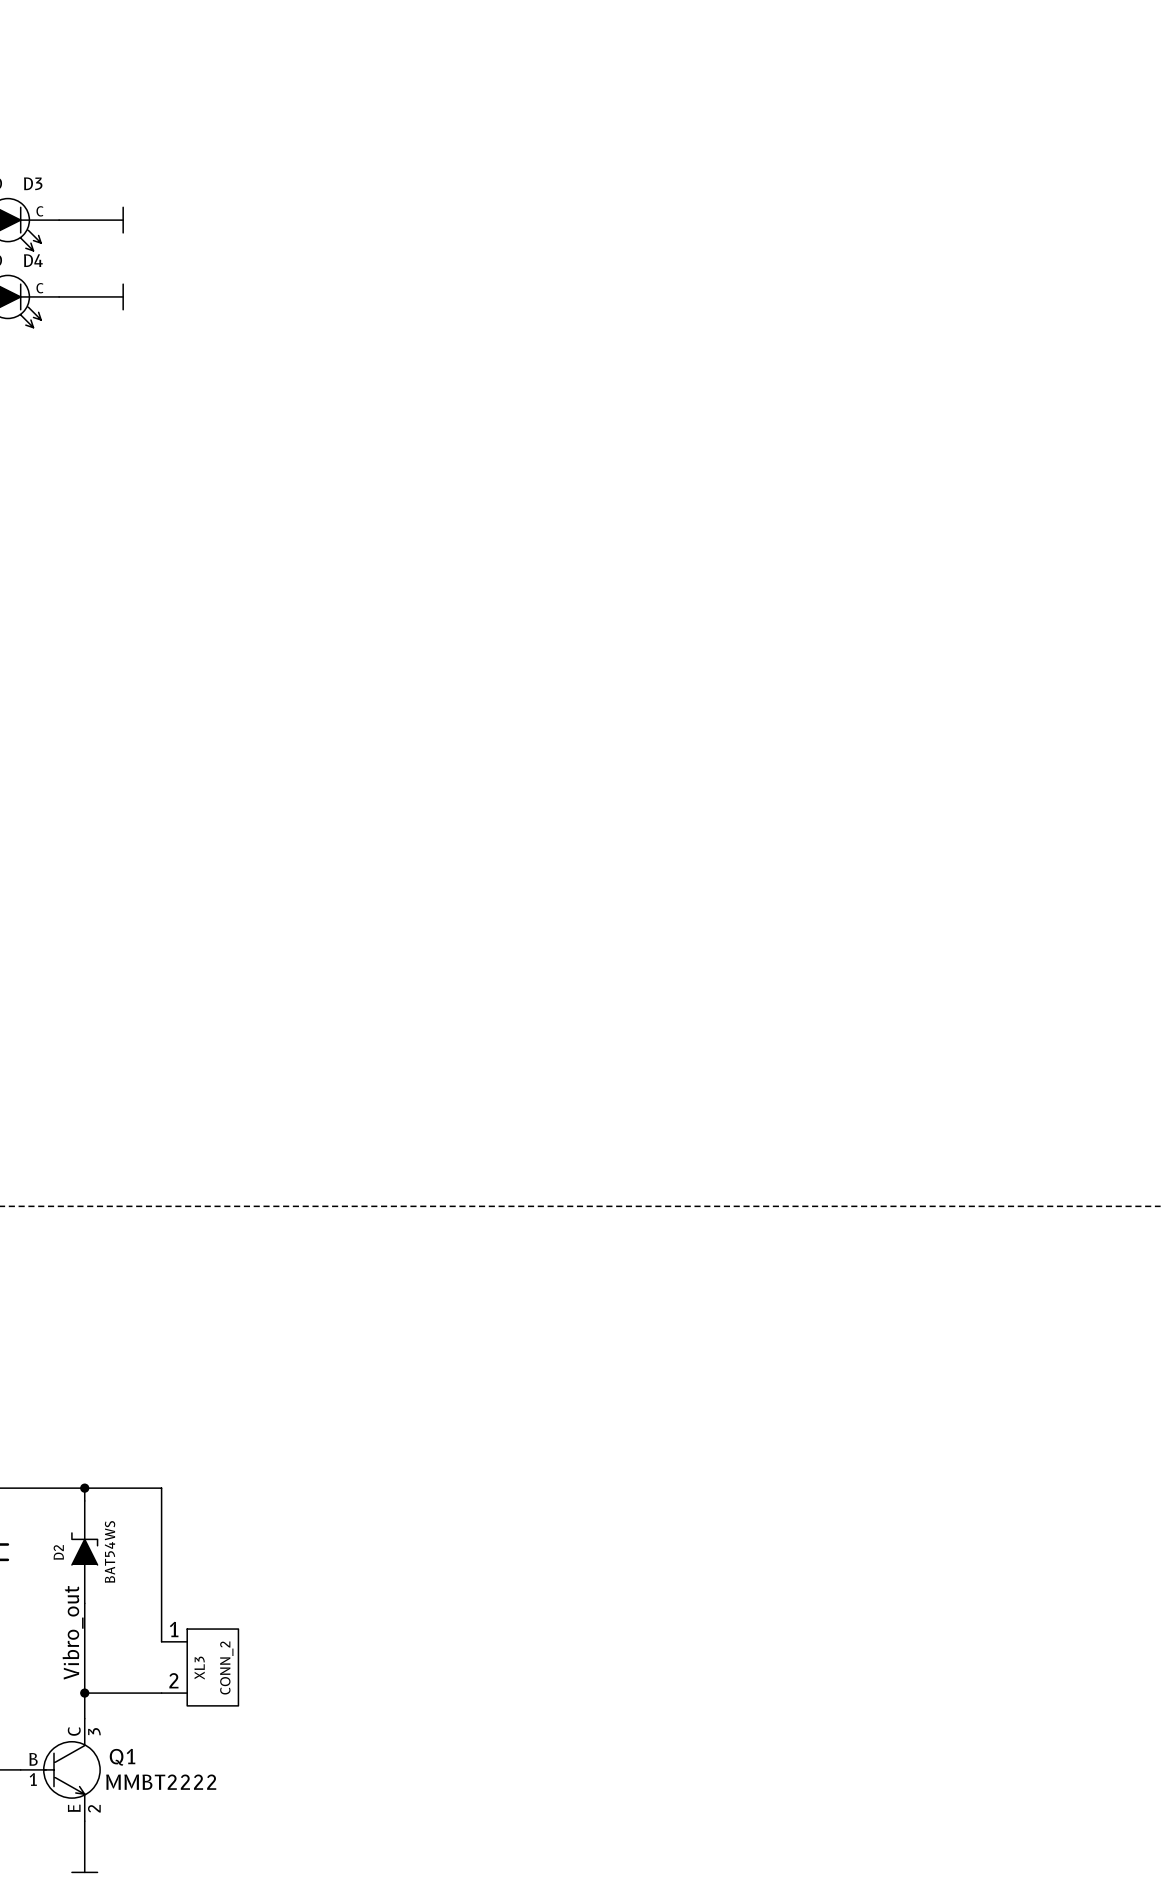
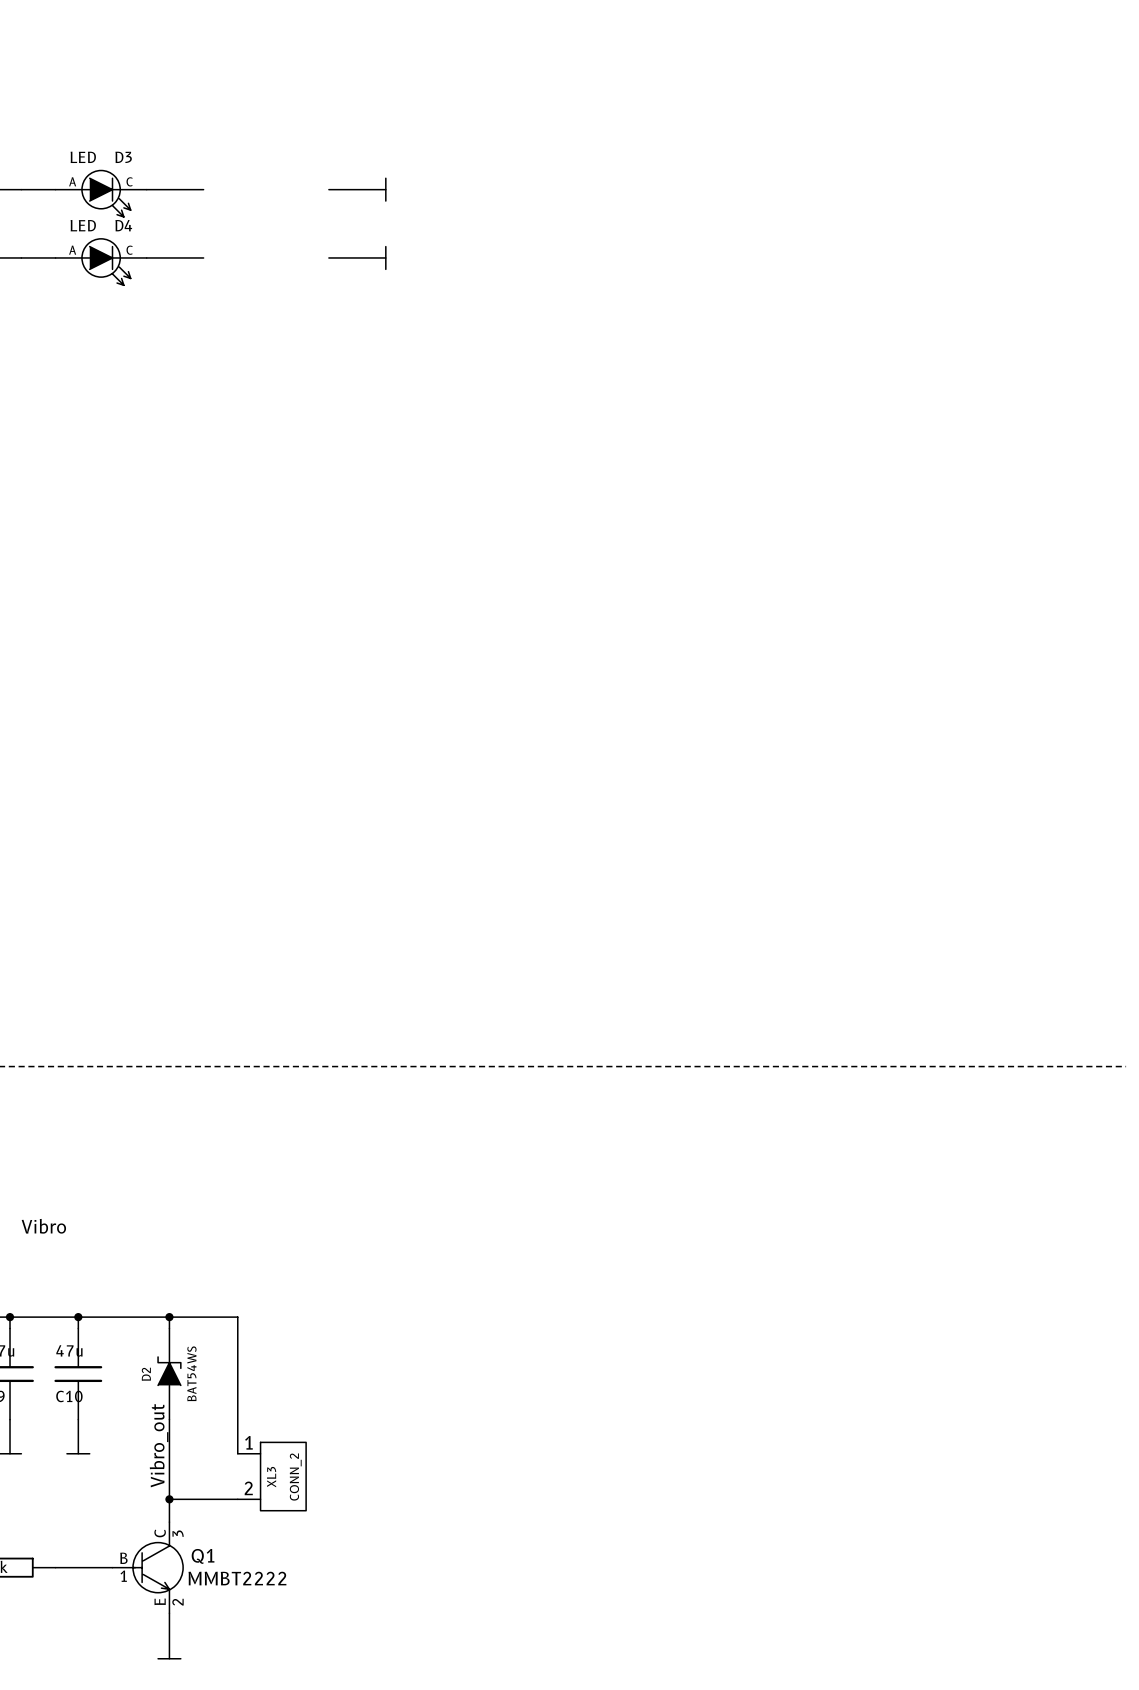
power symbol: (123, 220) -> none
wire: none -> (328, 189) (385, 189)
power symbol: none -> (385, 189)
power symbol: (123, 296) -> none
wire: none -> (328, 257) (385, 257)
power symbol: none -> (385, 257)

